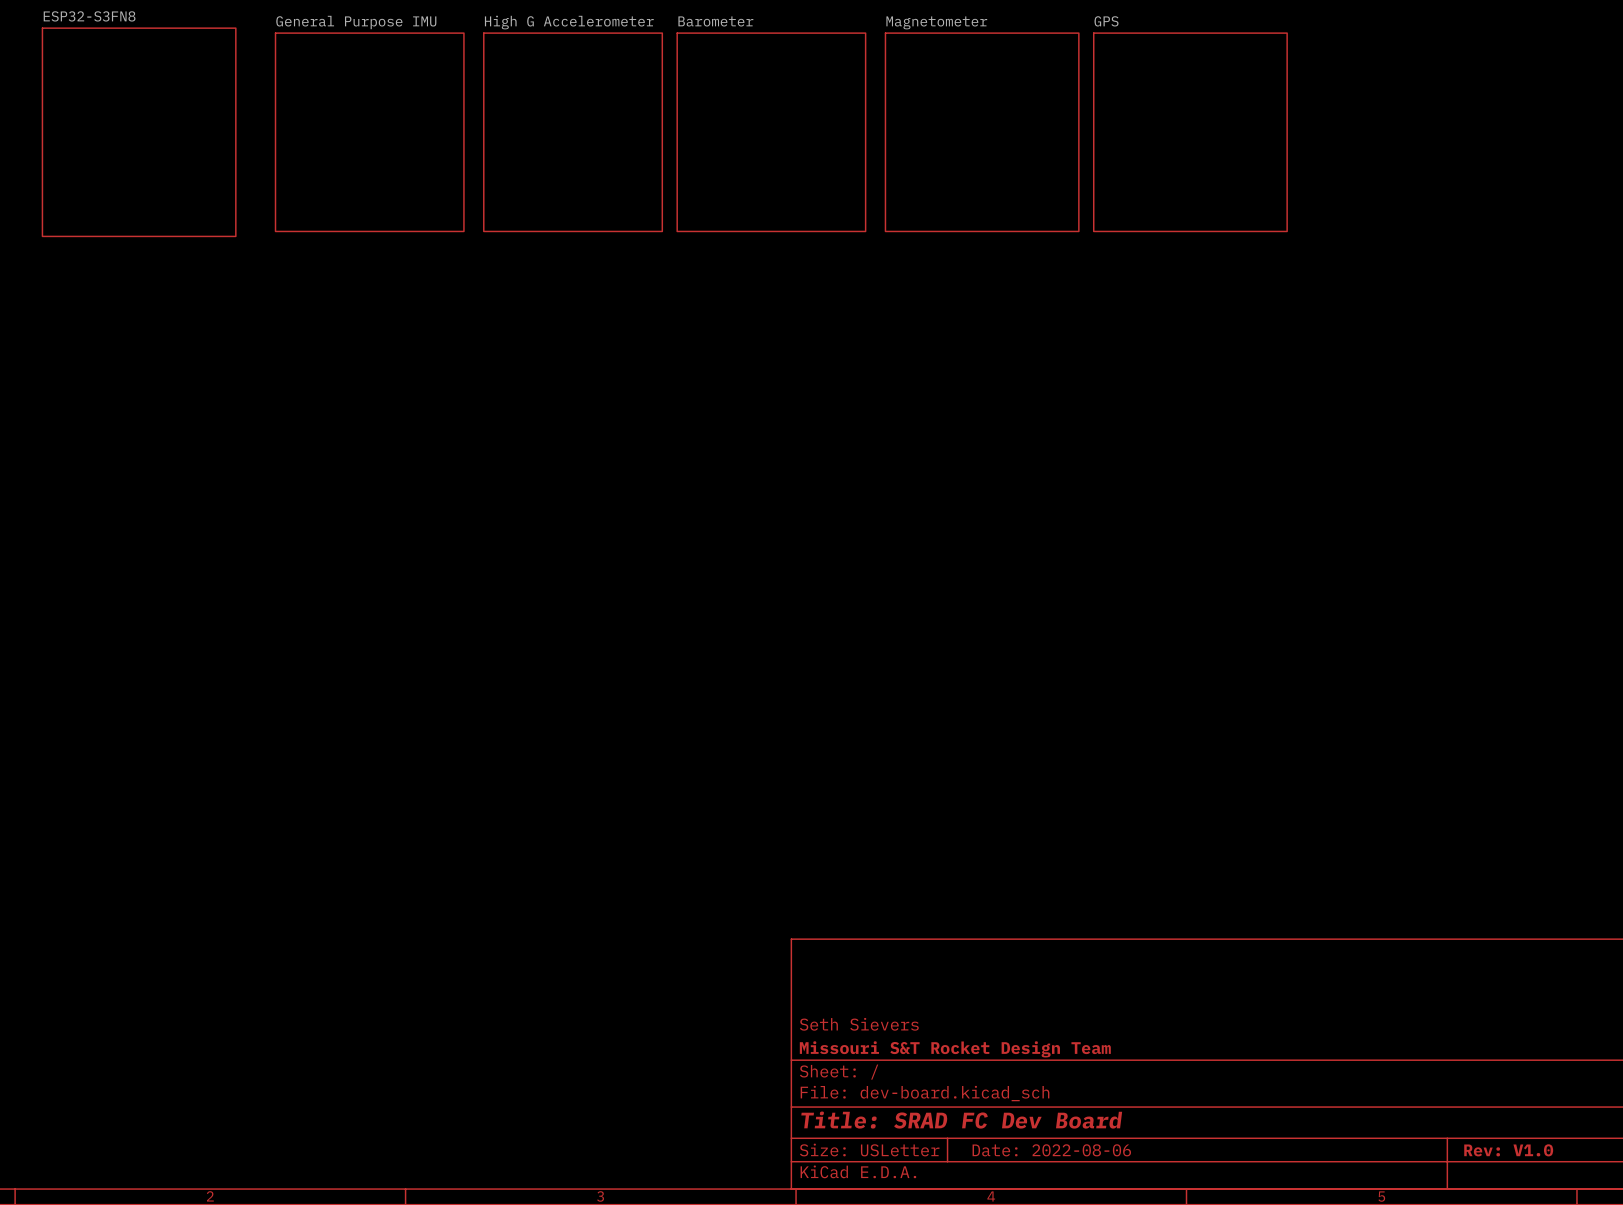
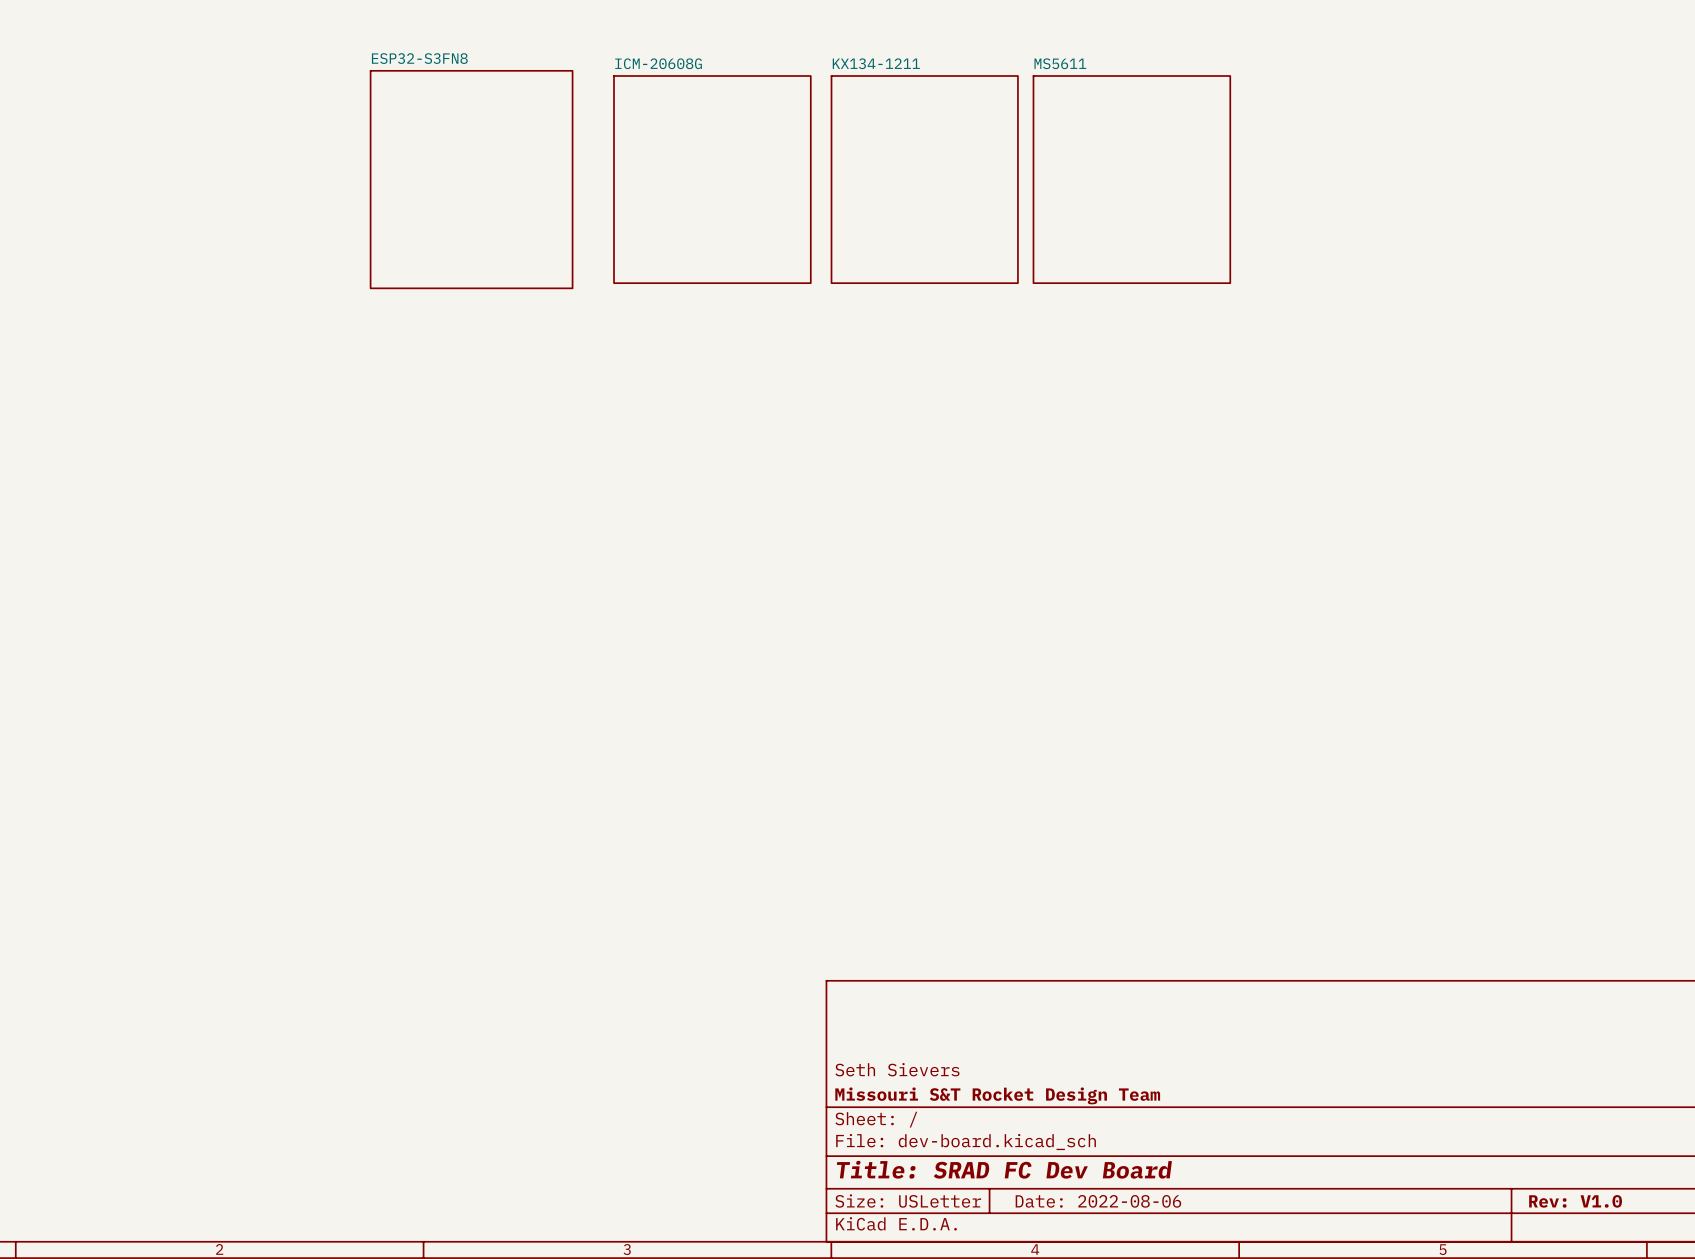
sheet ESP32-S3FN8 position: (139, 132) -> (471, 179)
sheet General Purpose IMU: (369, 132) -> none
sheet High G Accelerometer: (573, 132) -> none
sheet Barometer: (771, 132) -> none
sheet Magnetometer: (982, 132) -> none
sheet GPS: (1190, 132) -> none
sheet ICM-20608G: none -> (712, 179)
sheet KX134-1211: none -> (924, 179)
sheet MS5611: none -> (1131, 179)

